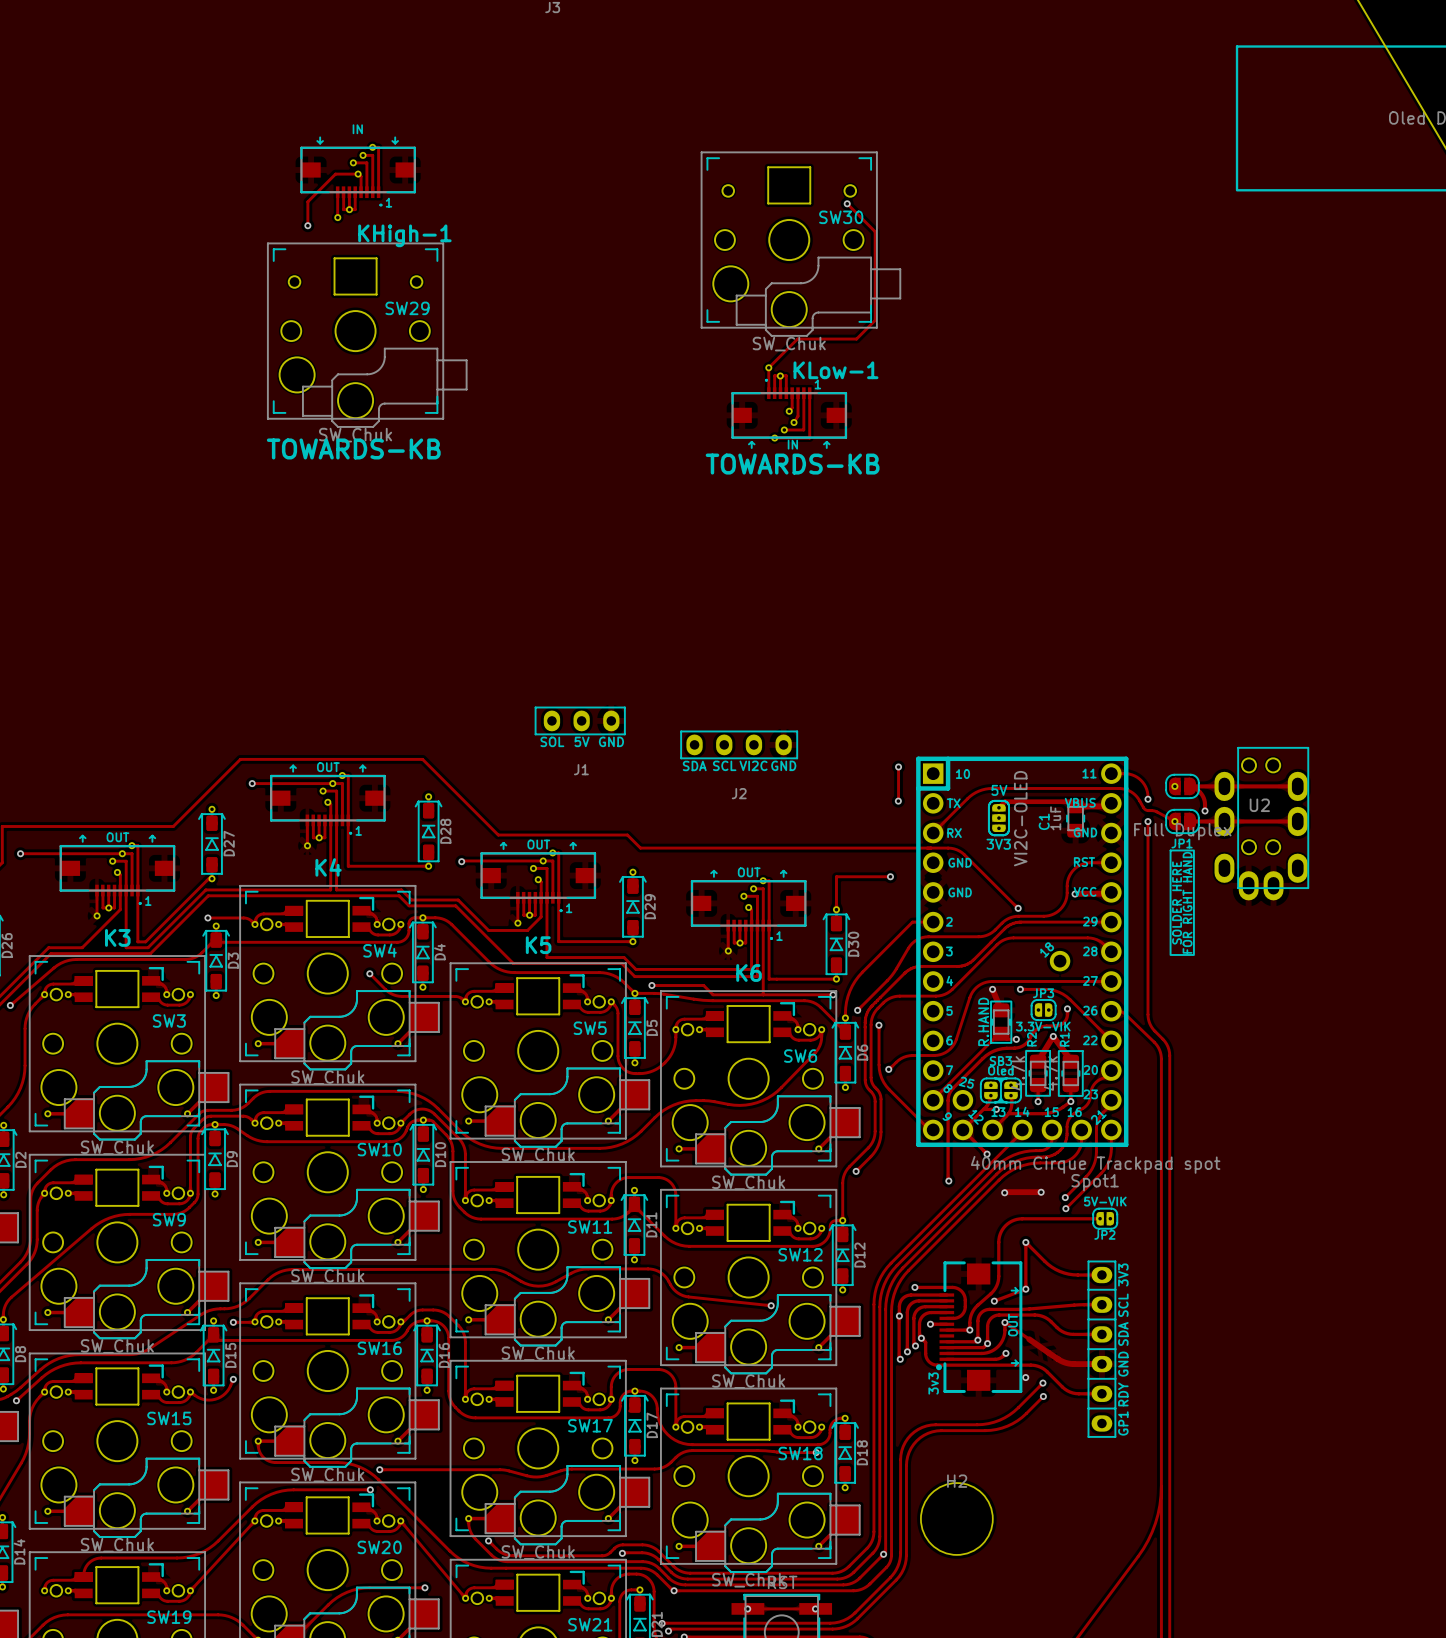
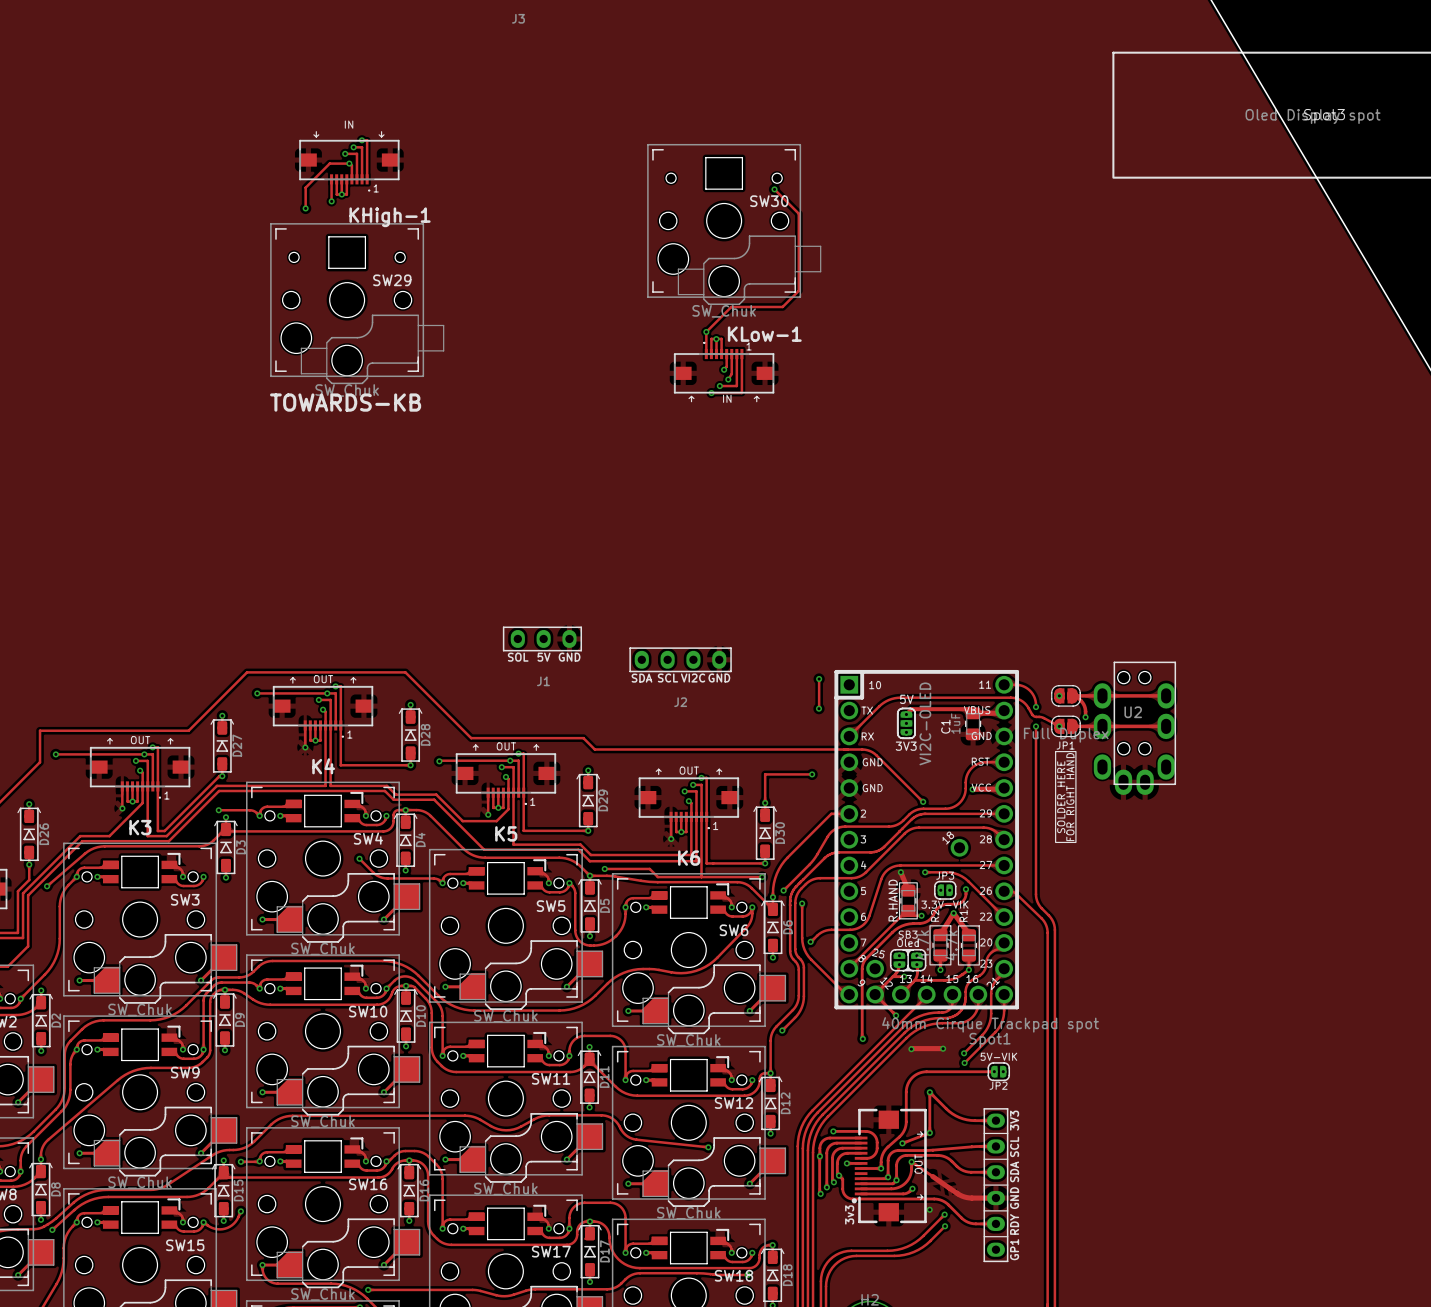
text: TOWARDS-KB (792, 464) -> none

